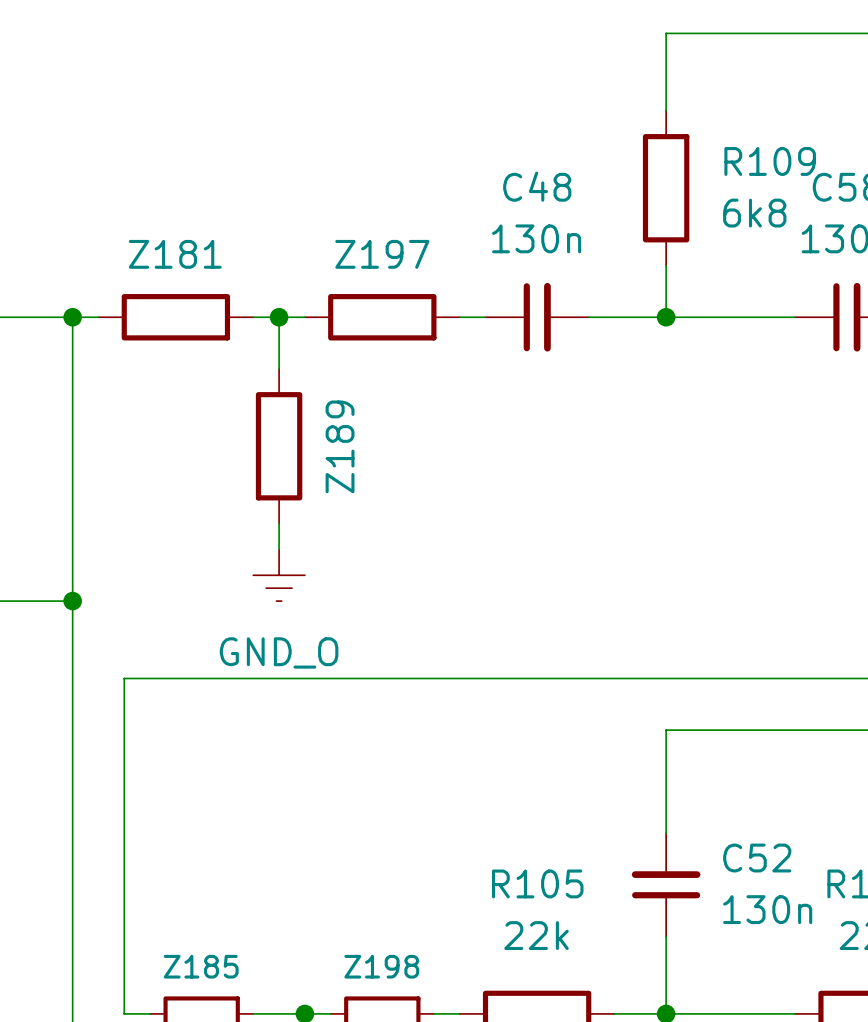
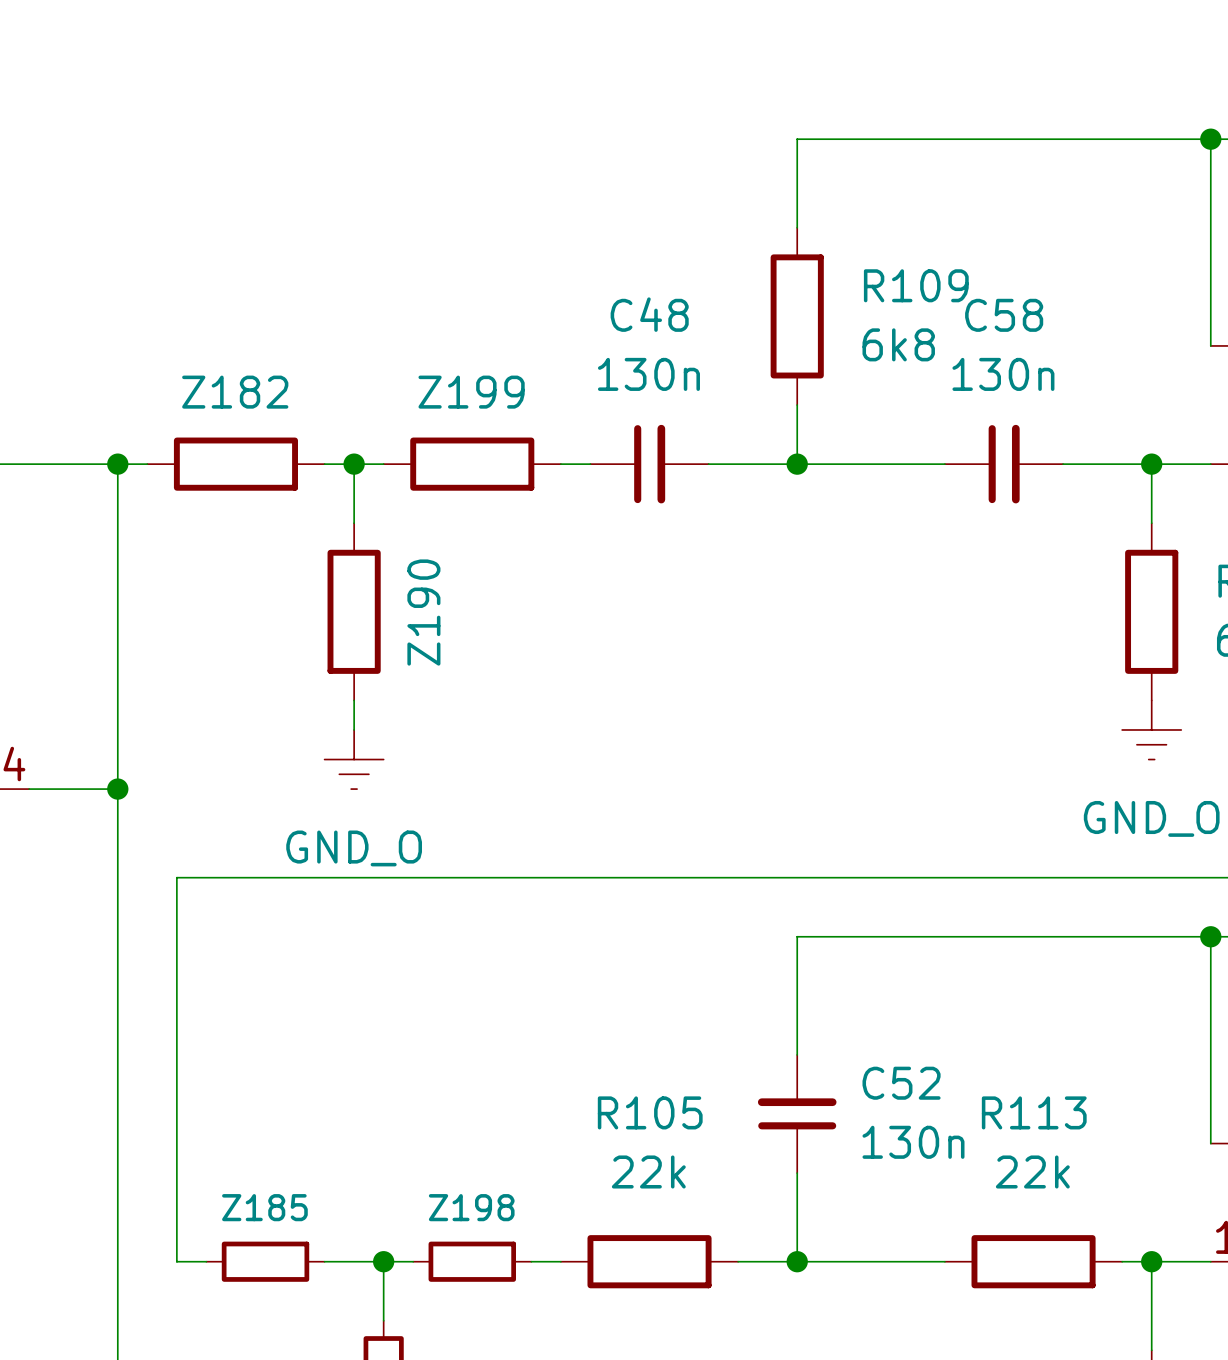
Z181 name: Z181 (175, 254) -> Z182 (235, 392)
Z197 name: Z197 (382, 254) -> Z199 (471, 392)
Z189 name: Z189 (340, 446) -> Z190 (423, 612)

